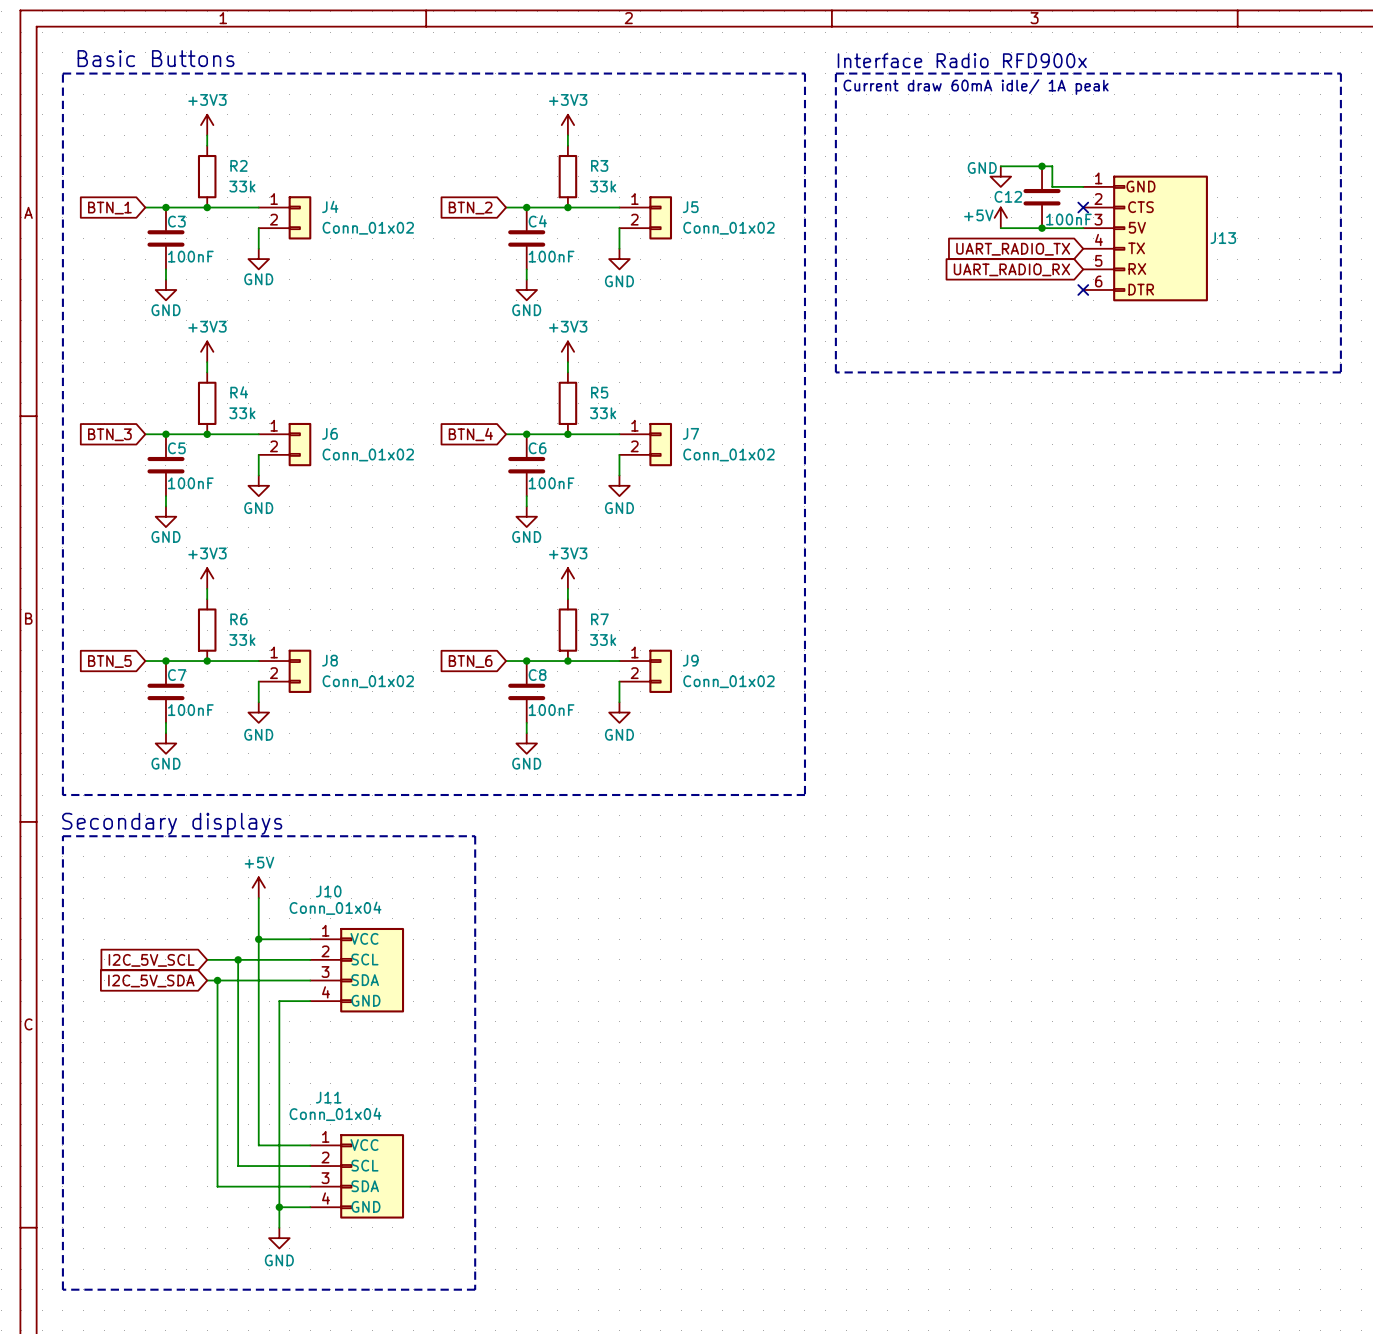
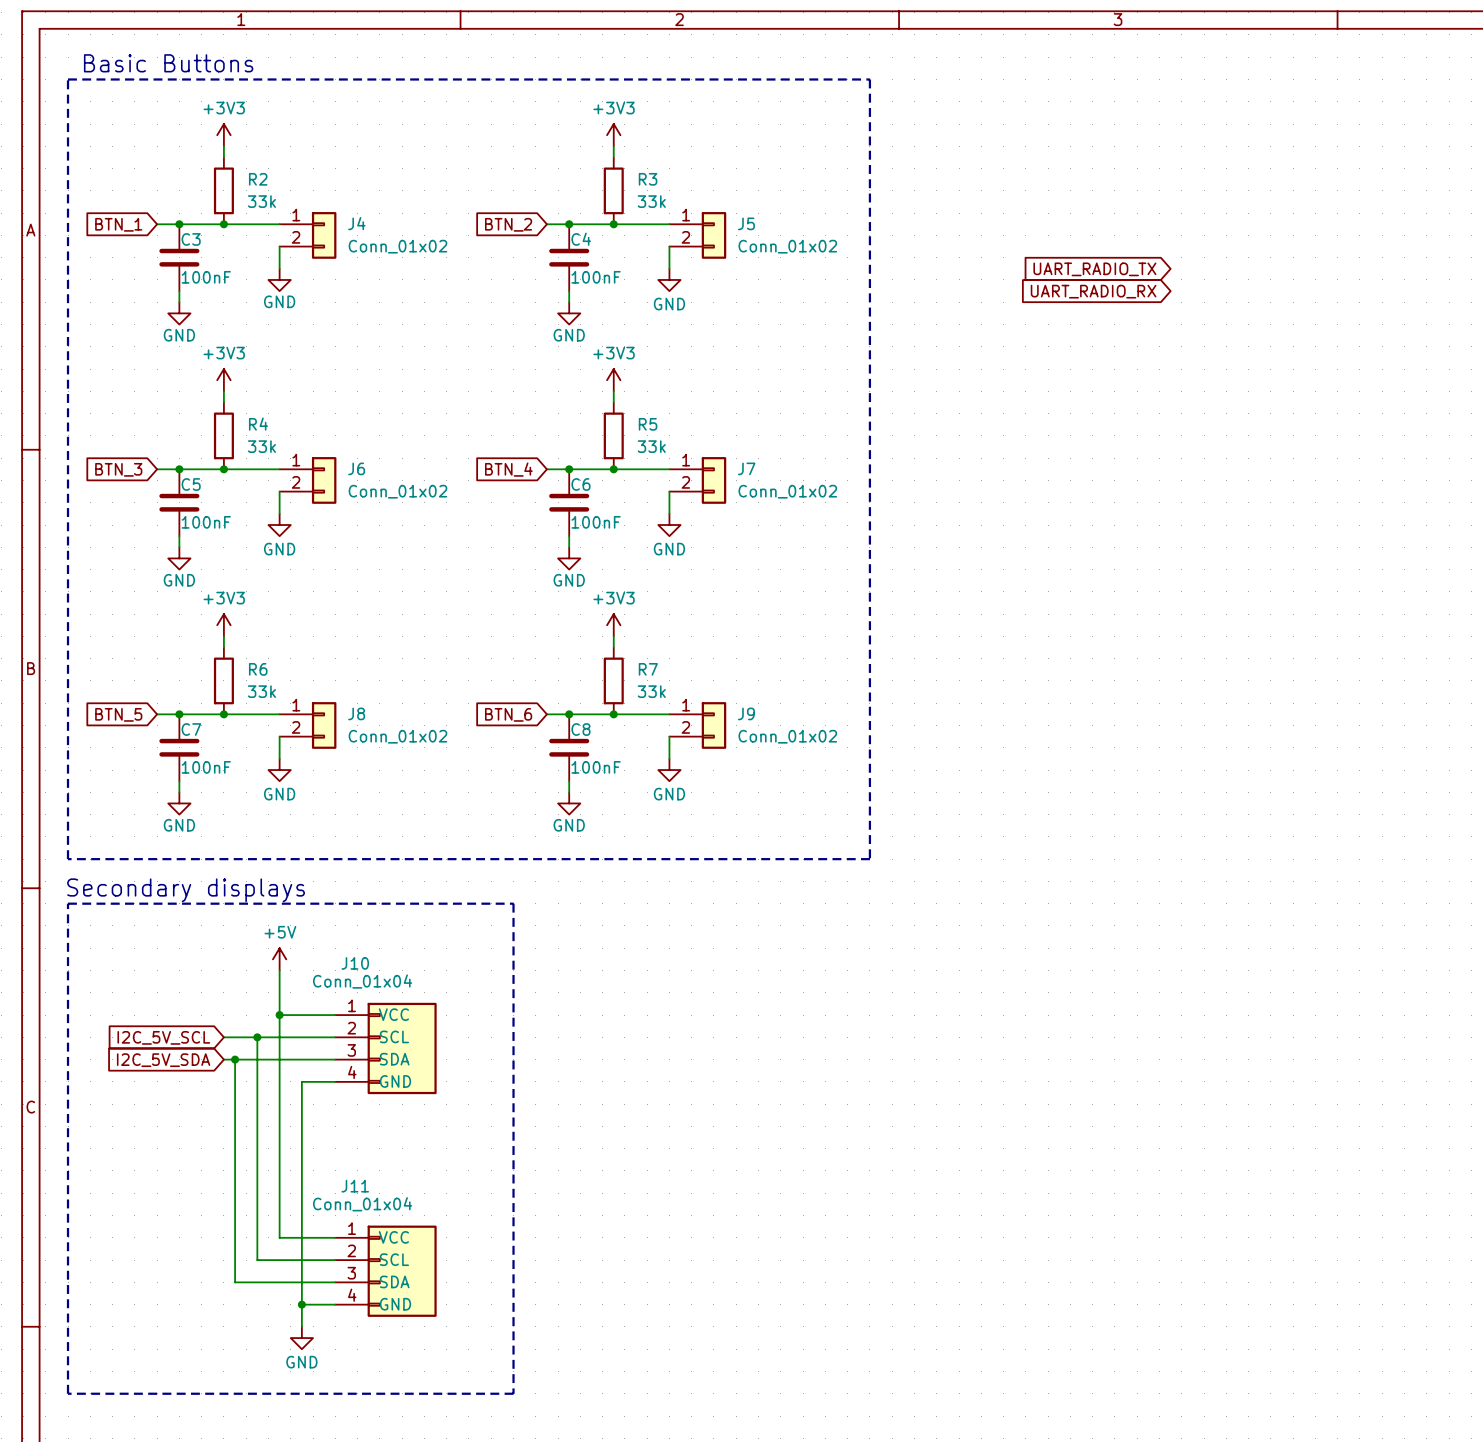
text: Interface Radio RFD900x (962, 60) -> none
line: (835, 73) (1340, 73) (1340, 372) (835, 372) (835, 73) -> none
text: Current draw 60mA idle/ 1A peak (976, 87) -> none
wire: (1000, 166) (1052, 166) (1052, 186) (1083, 186) -> none
junction: (1042, 166) -> none
power symbol: GND (1000, 176) -> none
C12: 100nF (1042, 197) -> none
no-connect mark: (1083, 207) -> none
power symbol: +5V (1000, 217) -> none
wire: (1000, 228) (1083, 228) -> none
junction: (1042, 228) -> none
J13: (1145, 238) -> none
no-connect mark: (1083, 289) -> none

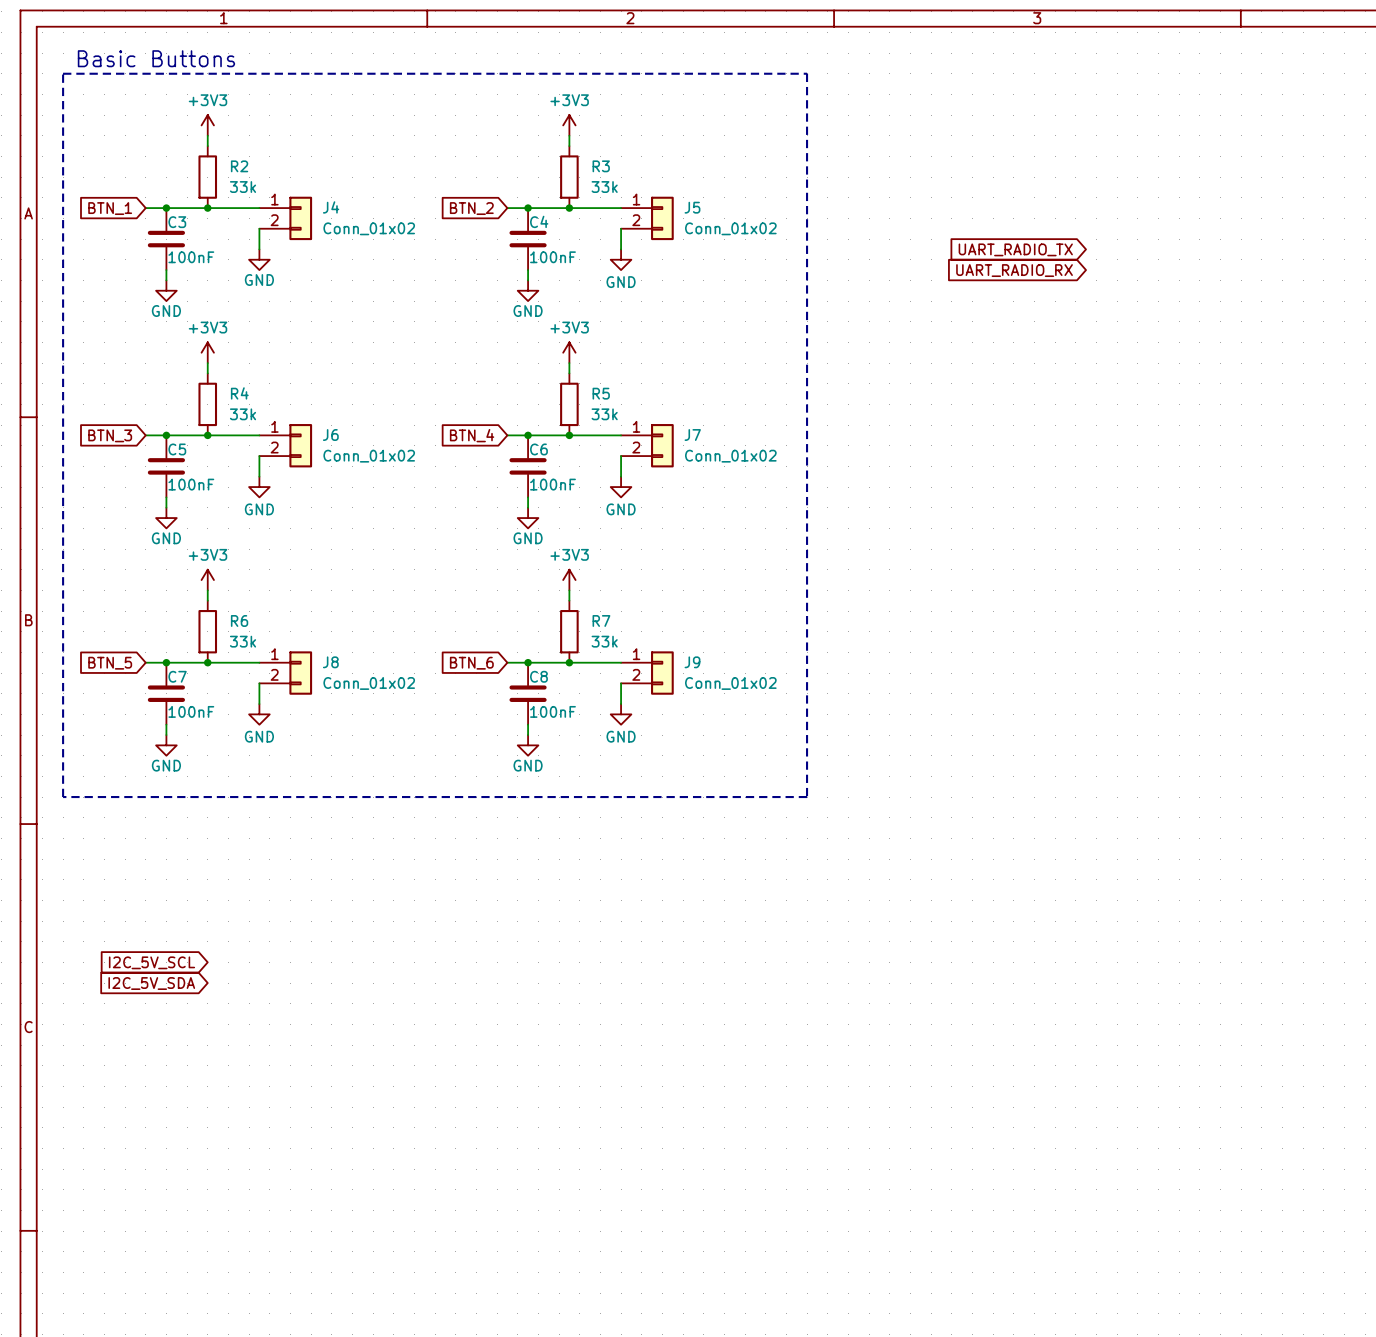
text: Secondary displays (186, 890) -> none
line: (68, 903) (513, 903) (513, 1393) (68, 1393) (68, 903) -> none
power symbol: +5V (279, 959) -> none
wire: (279, 970) (279, 1237) (335, 1237) -> none
wire: (279, 1015) (335, 1015) -> none
junction: (279, 1015) -> none
wire: (223, 1037) (335, 1037) -> none
wire: (257, 1037) (257, 1260) (335, 1260) -> none
junction: (257, 1037) -> none
J10: Conn_01x04 (385, 1048) -> none
wire: (223, 1059) (335, 1059) -> none
wire: (235, 1059) (235, 1282) (335, 1282) -> none
junction: (235, 1059) -> none
wire: (335, 1081) (301, 1081) (301, 1326) -> none
J11: Conn_01x04 (385, 1271) -> none
wire: (301, 1304) (335, 1304) -> none
junction: (301, 1304) -> none
power symbol: GND (301, 1338) -> none

